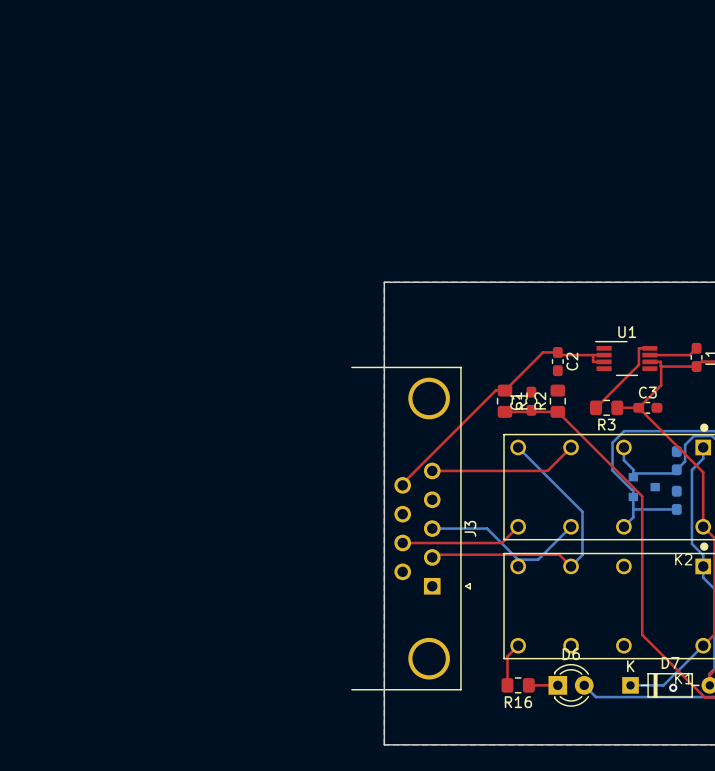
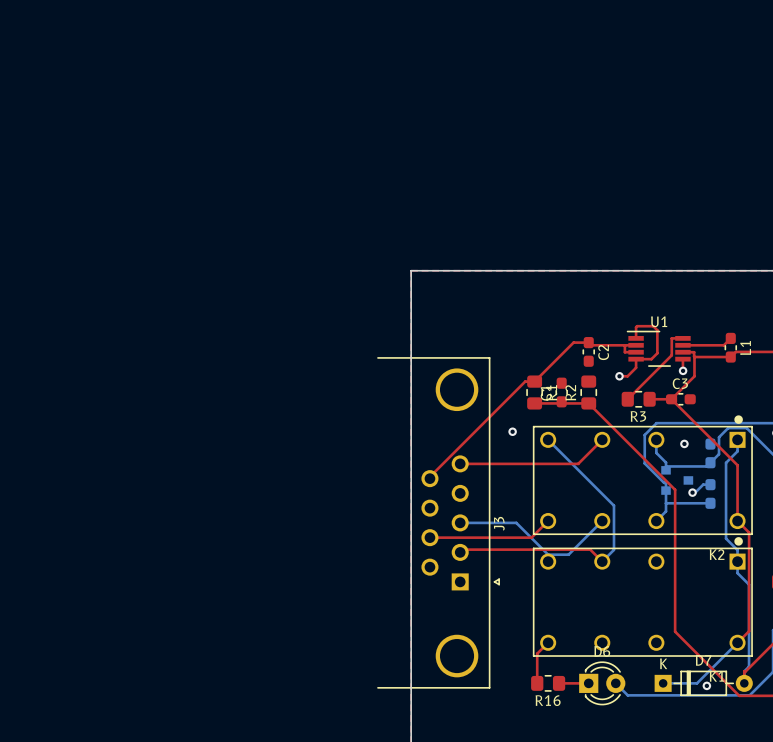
top track: none -> (636, 338) (637, 326) (653, 326) (657, 330) (657, 353) (651, 359) (636, 359) (636, 367) (627, 376) (619, 376)
top track: none -> (682, 359) (682, 370)
via: none -> (683, 370)
via: none -> (619, 376)
via: none -> (512, 431)
via: none -> (684, 443)
bottom track: none -> (710, 484) (703, 484) (695, 492) (692, 492)
via: none -> (692, 492)

